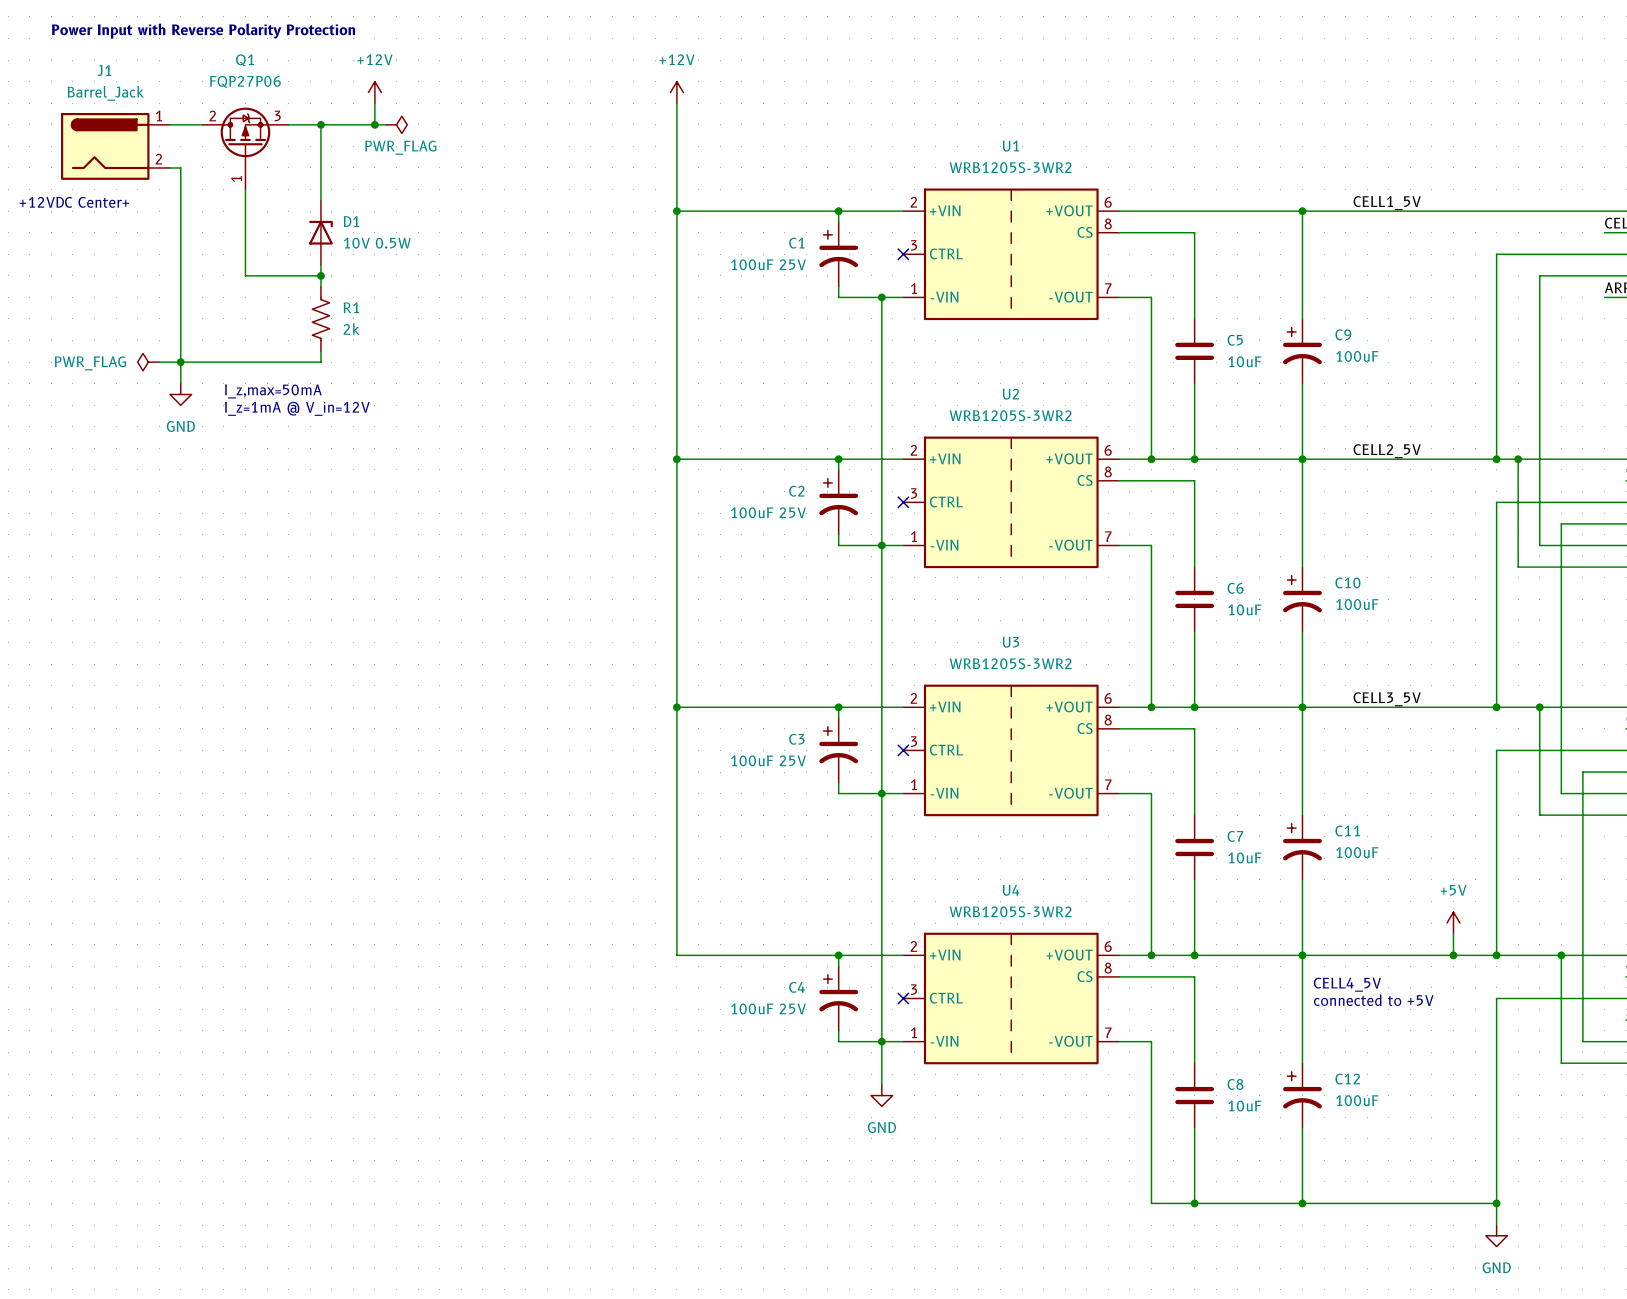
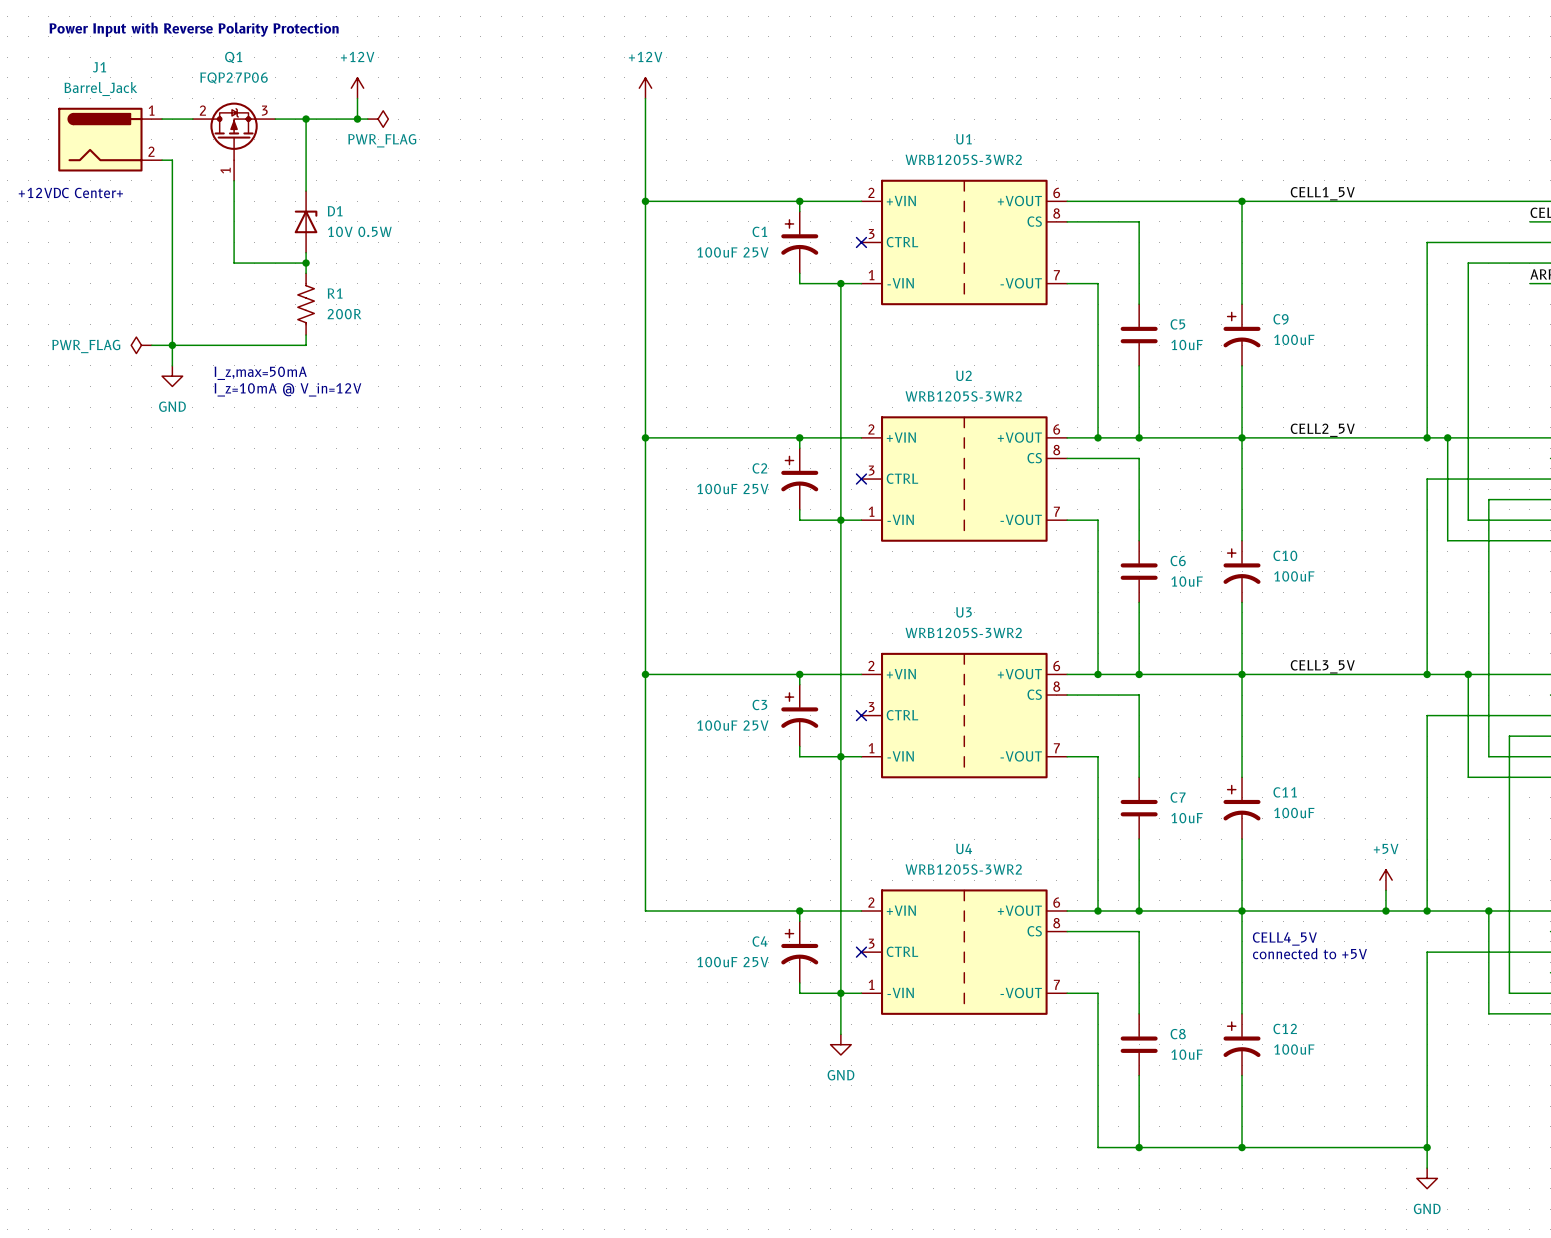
R1 value: 2k (351, 329) -> 200R (344, 314)
text: I_z=1mA @ V_in=12V (297, 408) -> I_z=10mA @ V_in=12V (287, 389)

